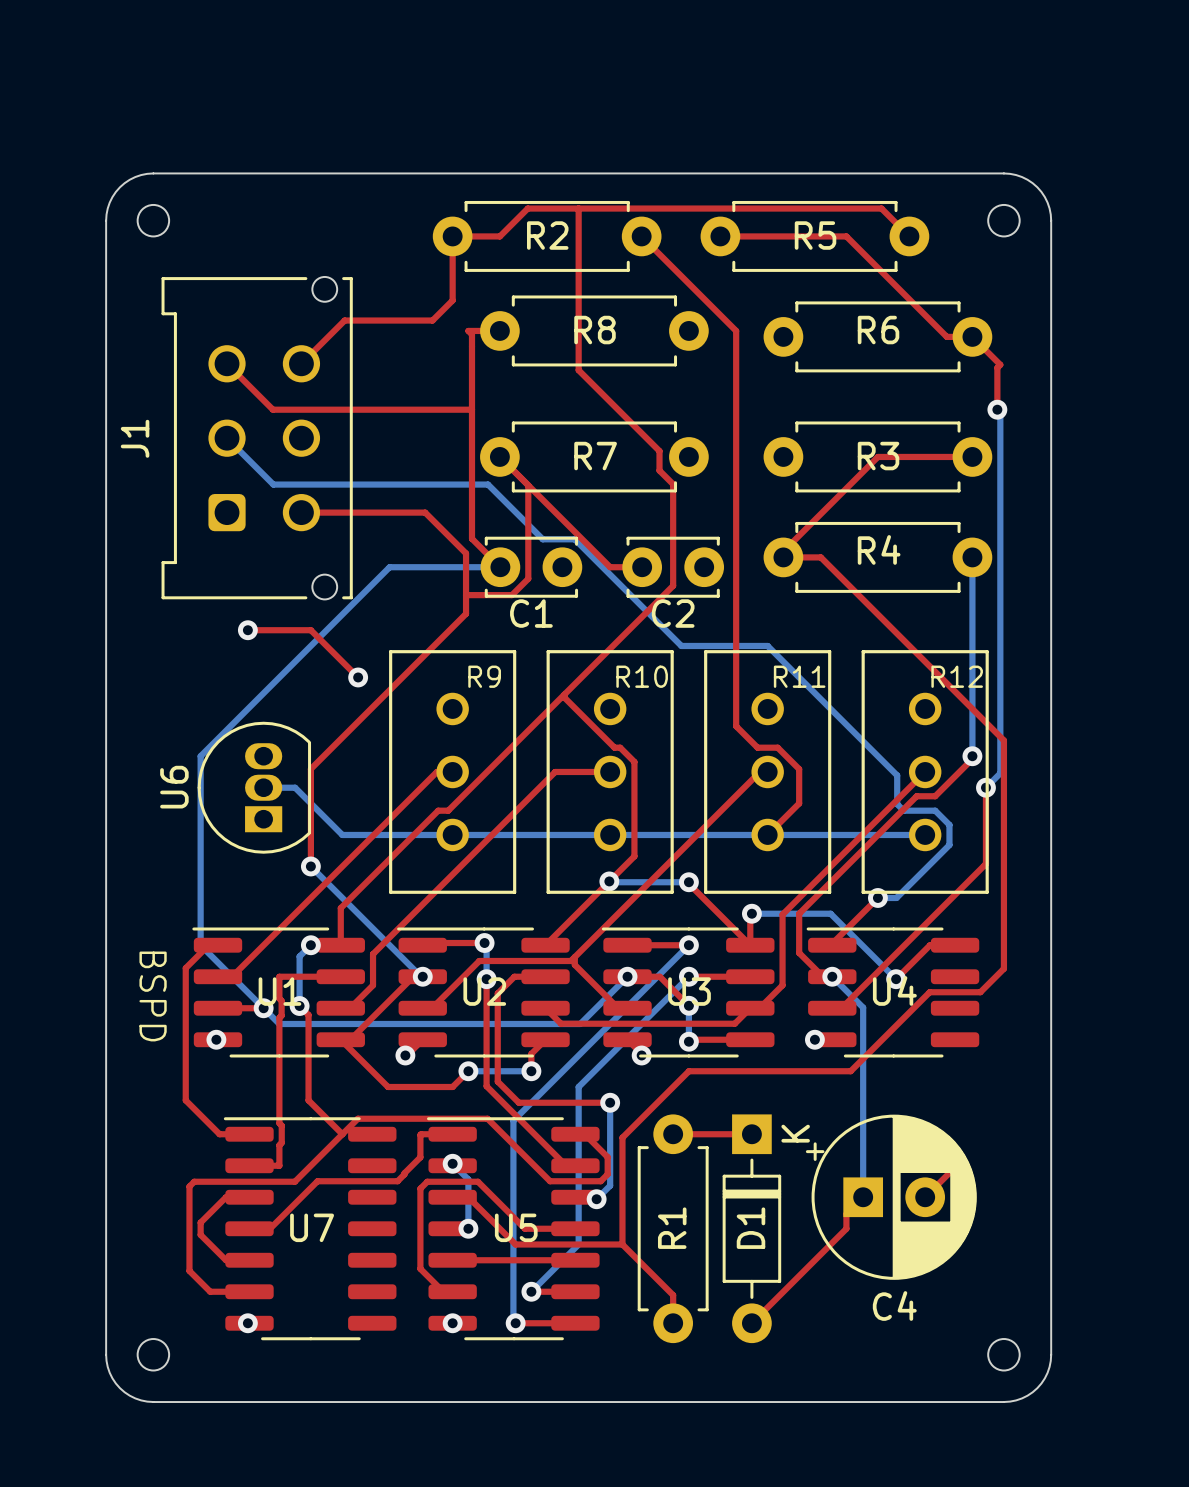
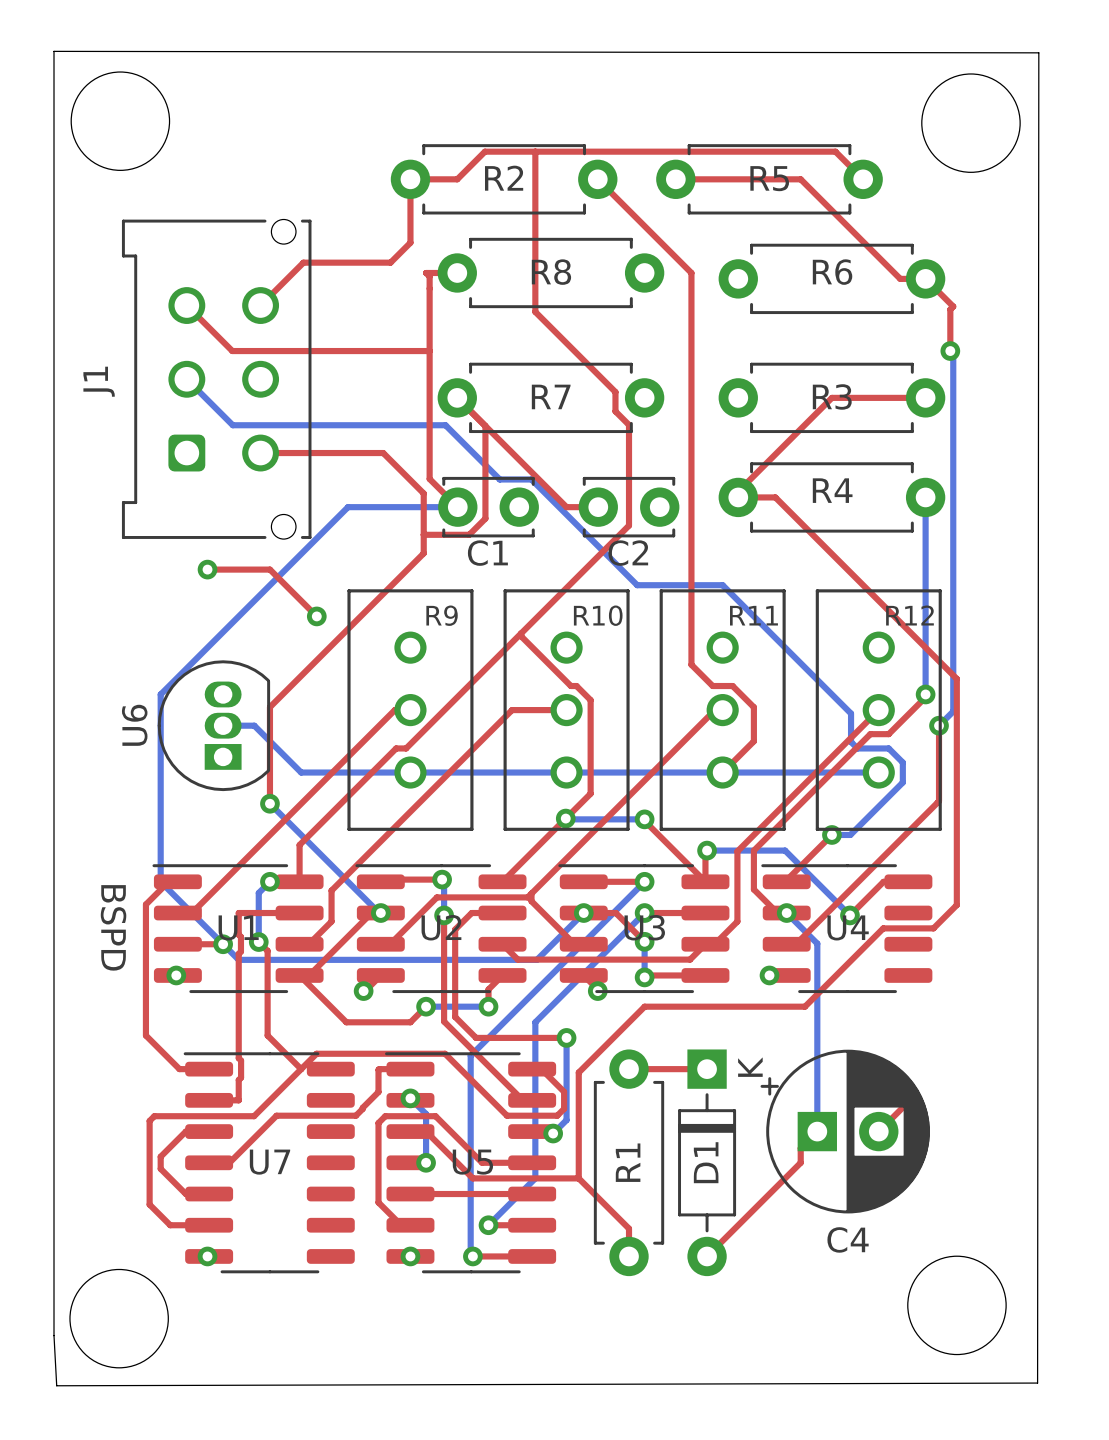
round board edge: none -> [70, 71, 171, 171]
round board edge: none -> [921, 73, 1021, 173]
board edge: (153, 173) (1003, 173) (1016, 175) (1027, 179) (1041, 191) (1049, 208) (1051, 220) (1051, 1354) (1049, 1366) (1044, 1378) (1032, 1392) (1022, 1398) (1003, 1402) (153, 1402) (141, 1400) (129, 1395) (115, 1383) (109, 1372) (106, 1354) (106, 220) (109, 202) (119, 187) (135, 177) (153, 173) -> (54, 51) (54, 1335) (56, 1385) (1037, 1383) (1038, 52) (54, 51)
round board edge: [137, 204, 170, 238] -> none
round board edge: [987, 204, 1021, 238] -> none
round board edge: none -> [69, 1268, 169, 1369]
round board edge: [137, 1338, 170, 1372] -> none
round board edge size: [987, 1338, 1021, 1372] -> [907, 1255, 1007, 1356]

